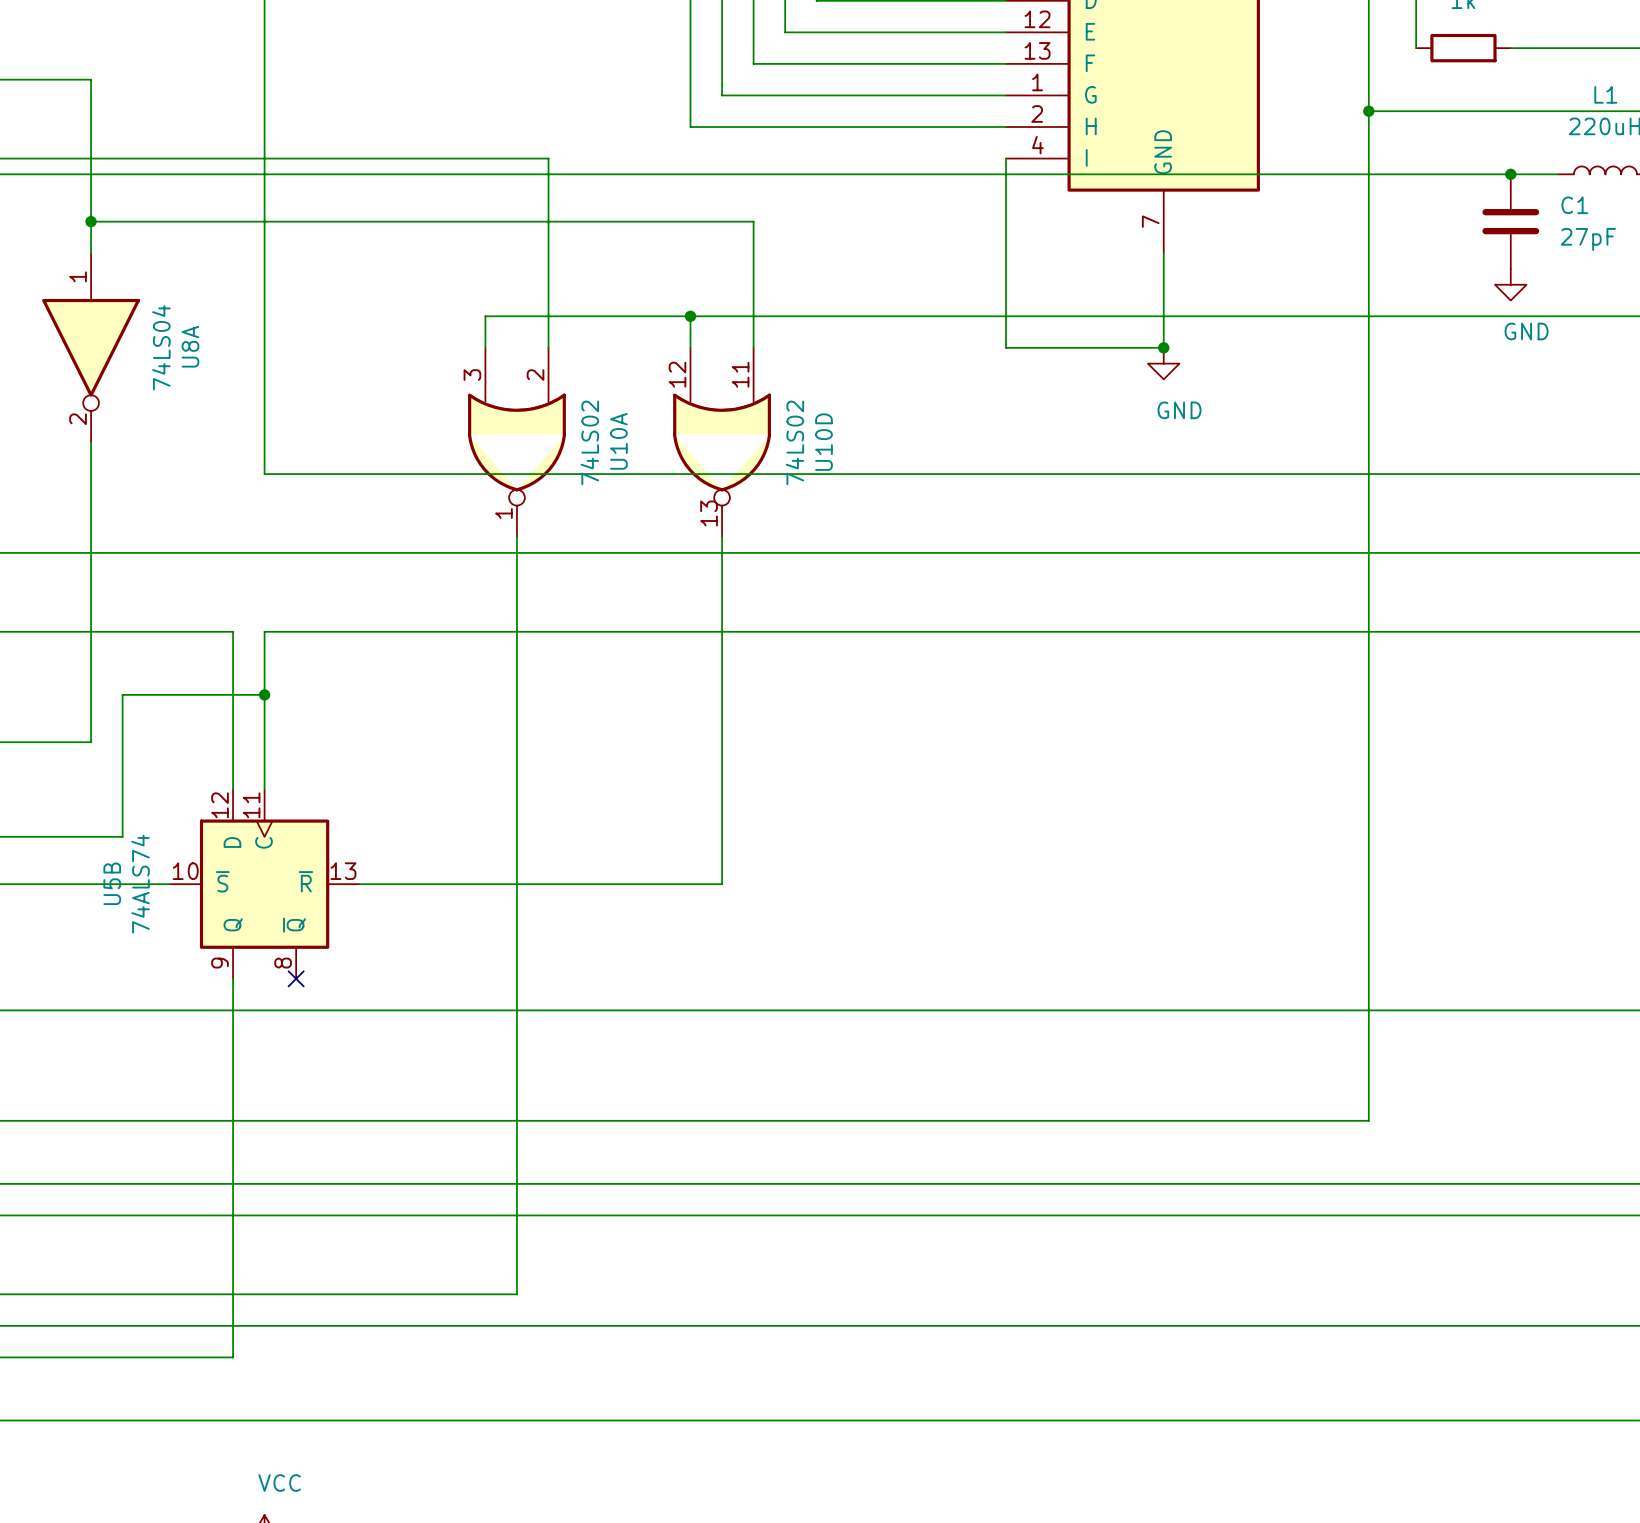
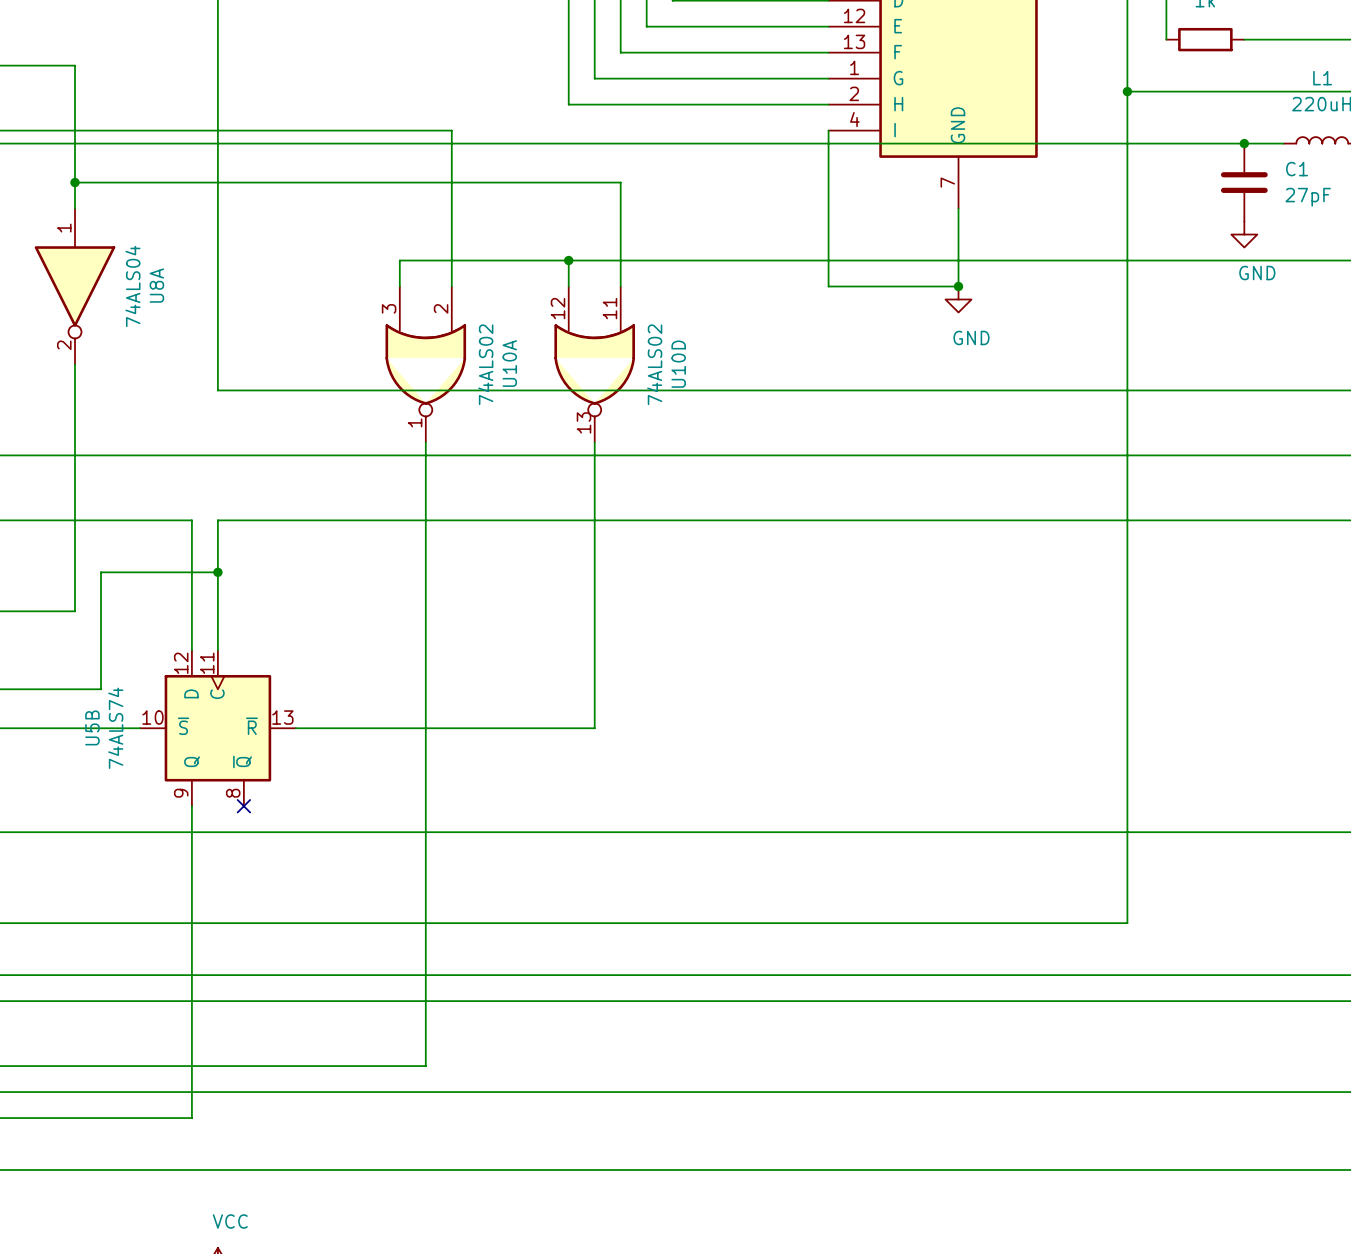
U8A value: 74LS04 (161, 347) -> 74ALS04 (132, 286)
U10A value: 74LS02 (589, 442) -> 74ALS02 (485, 364)
U10D value: 74LS02 (794, 442) -> 74ALS02 (654, 364)

